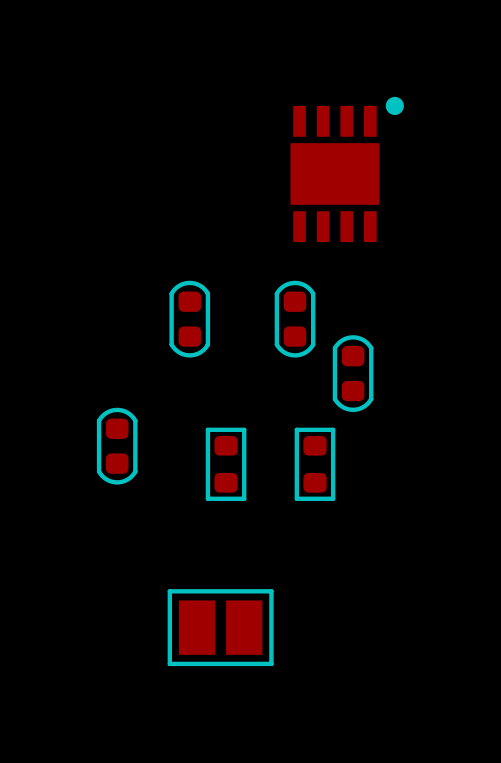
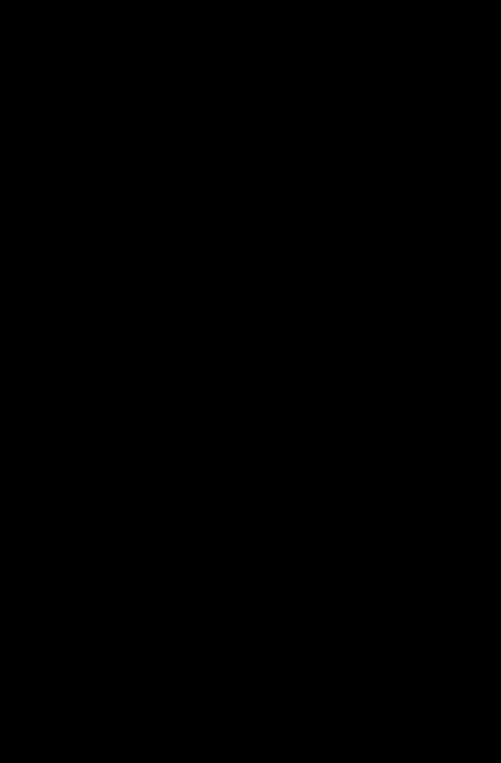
part: (347, 169) -> none
part: (189, 319) -> none
part: (295, 319) -> none
part: (353, 373) -> none
part: (117, 446) -> none
part: (226, 464) -> none
part: (314, 464) -> none
part: (220, 627) -> none

